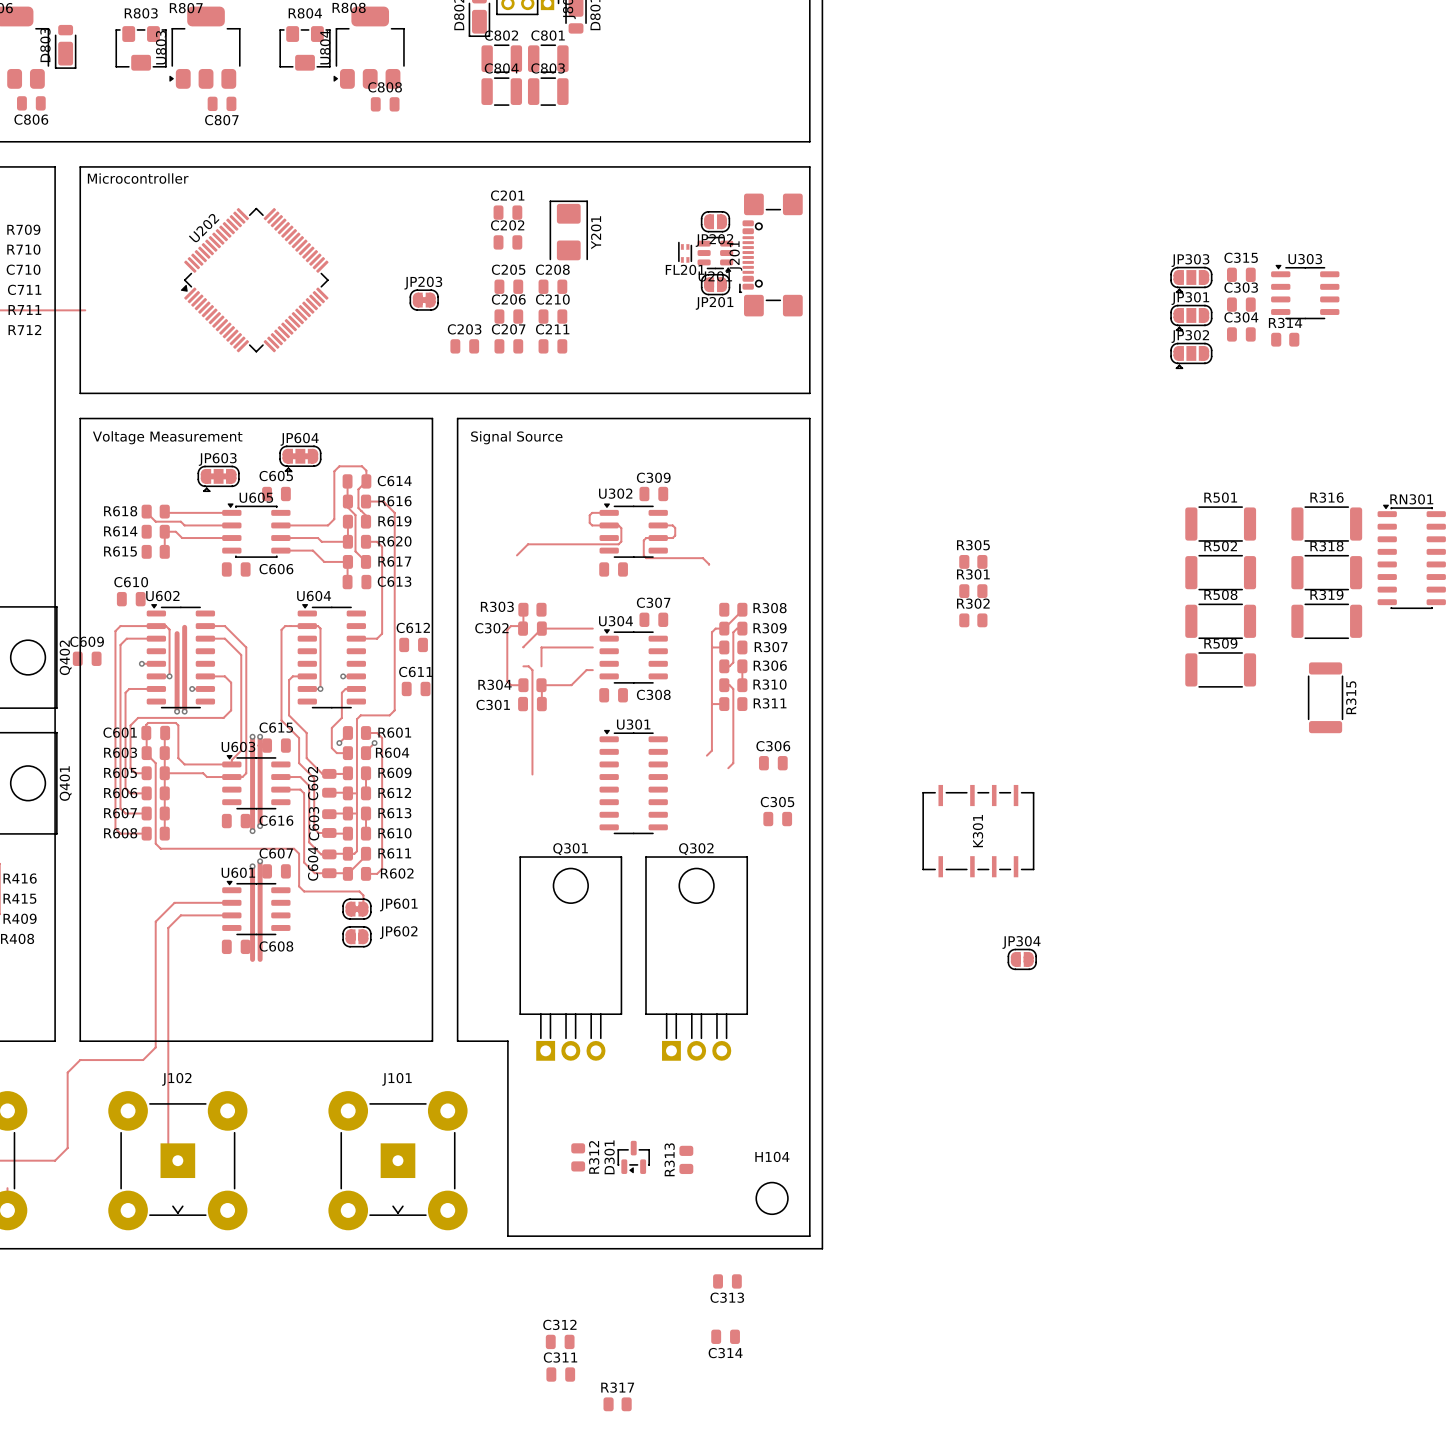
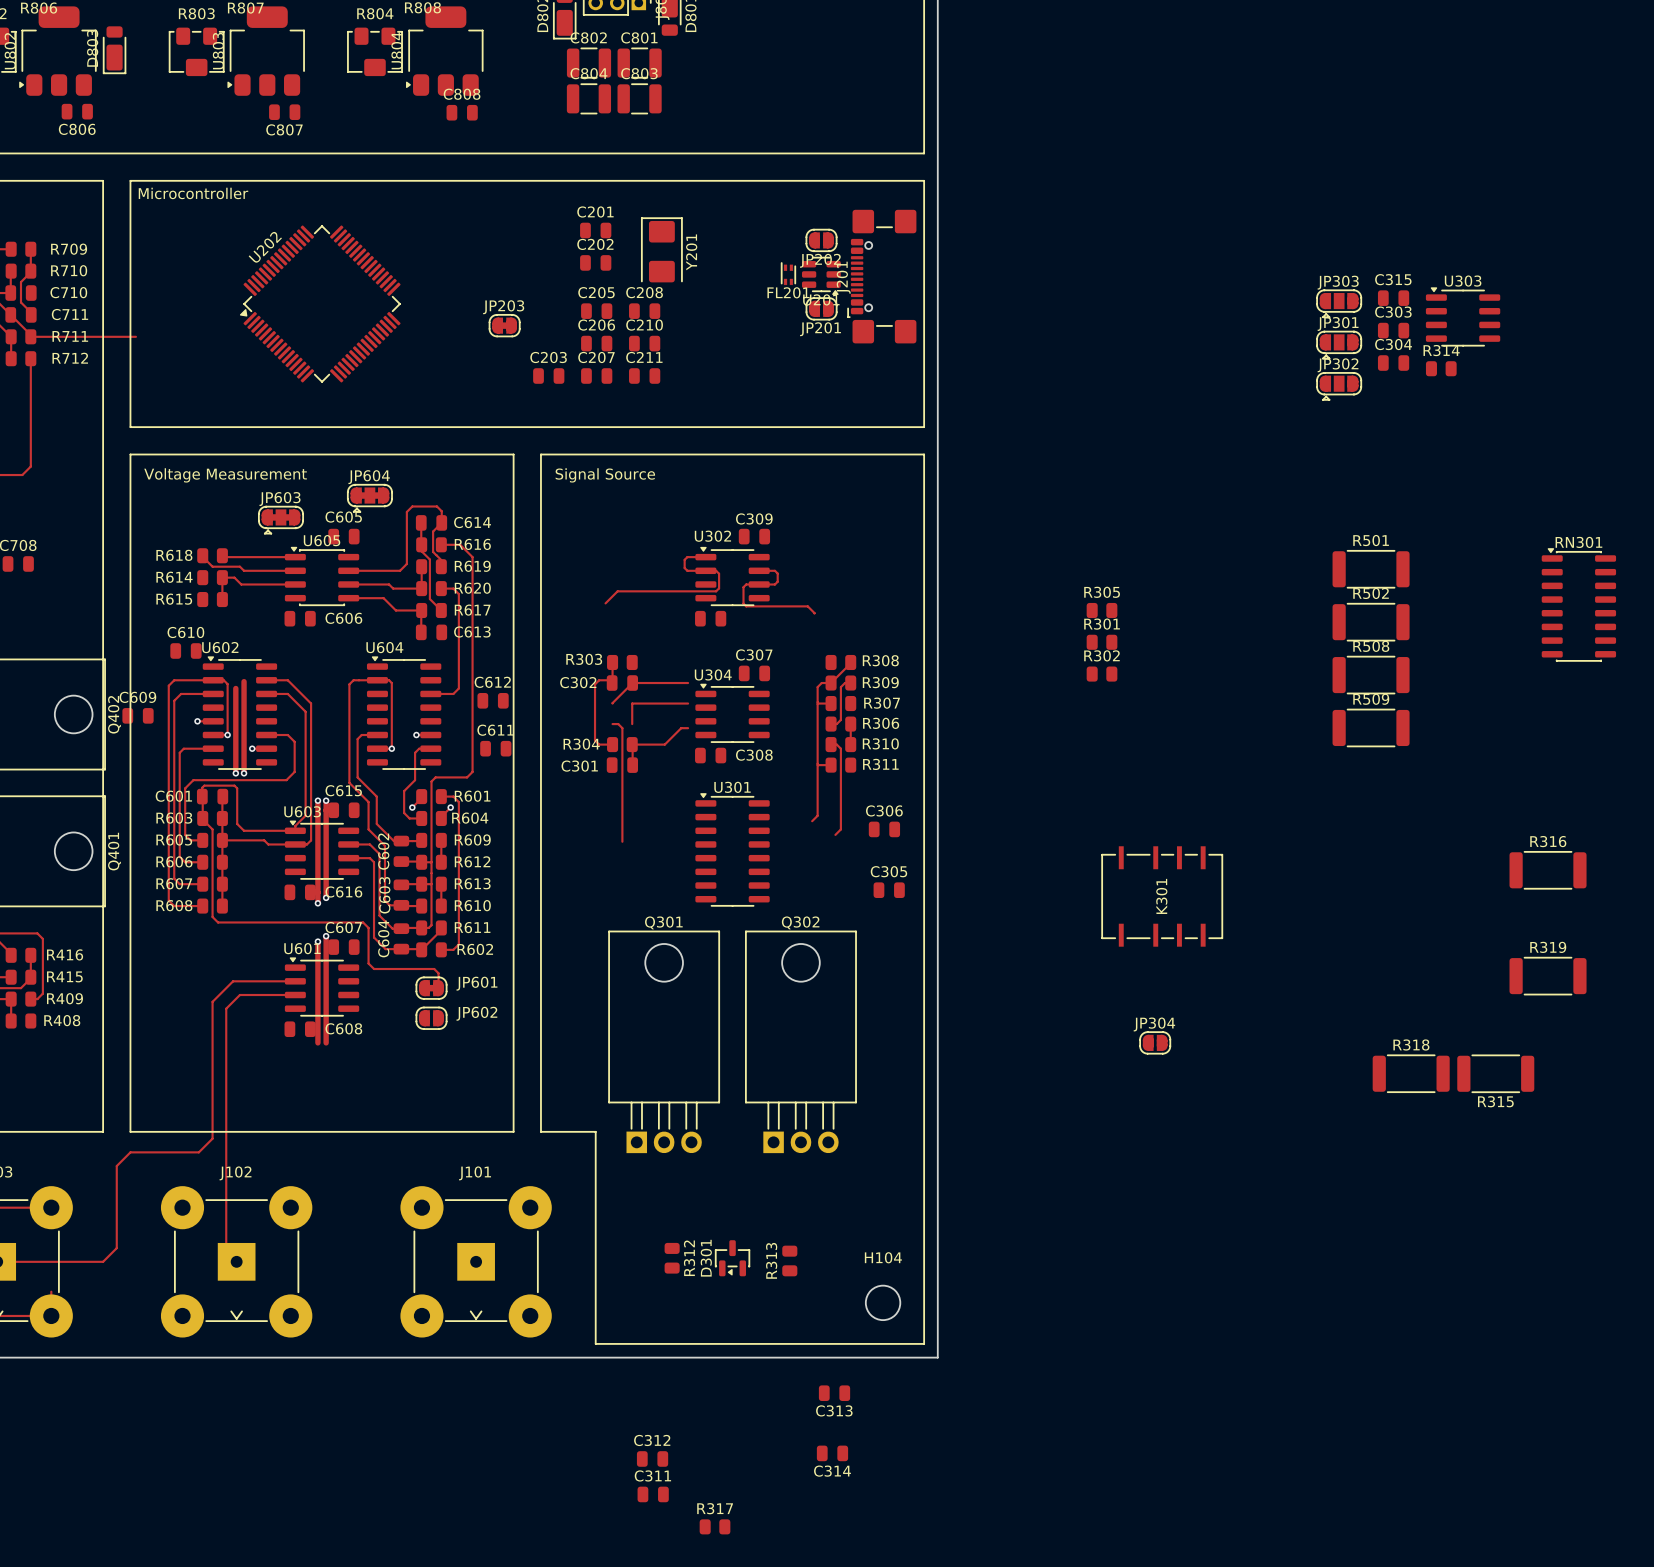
R316 position: (1326, 524) -> (1548, 870)
R318 position: (1326, 572) -> (1411, 1073)
R319 position: (1326, 621) -> (1548, 976)
R315 rotation: 0° (1325, 697) -> 90° clockwise (1495, 1073)
R315 position: (1325, 697) -> (1495, 1073)
K301 position: (978, 831) -> (1162, 896)

